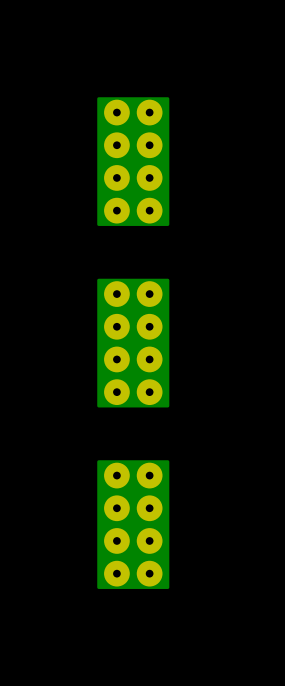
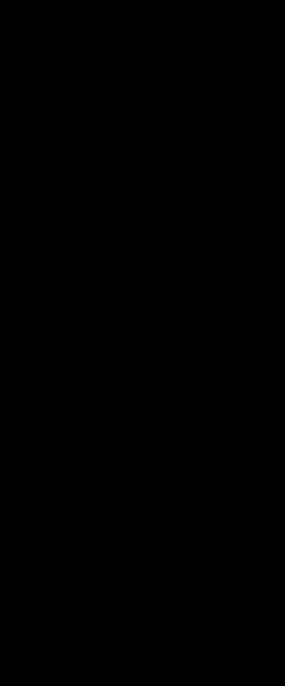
part: (133, 161) -> none
part: (133, 343) -> none
part: (133, 524) -> none

